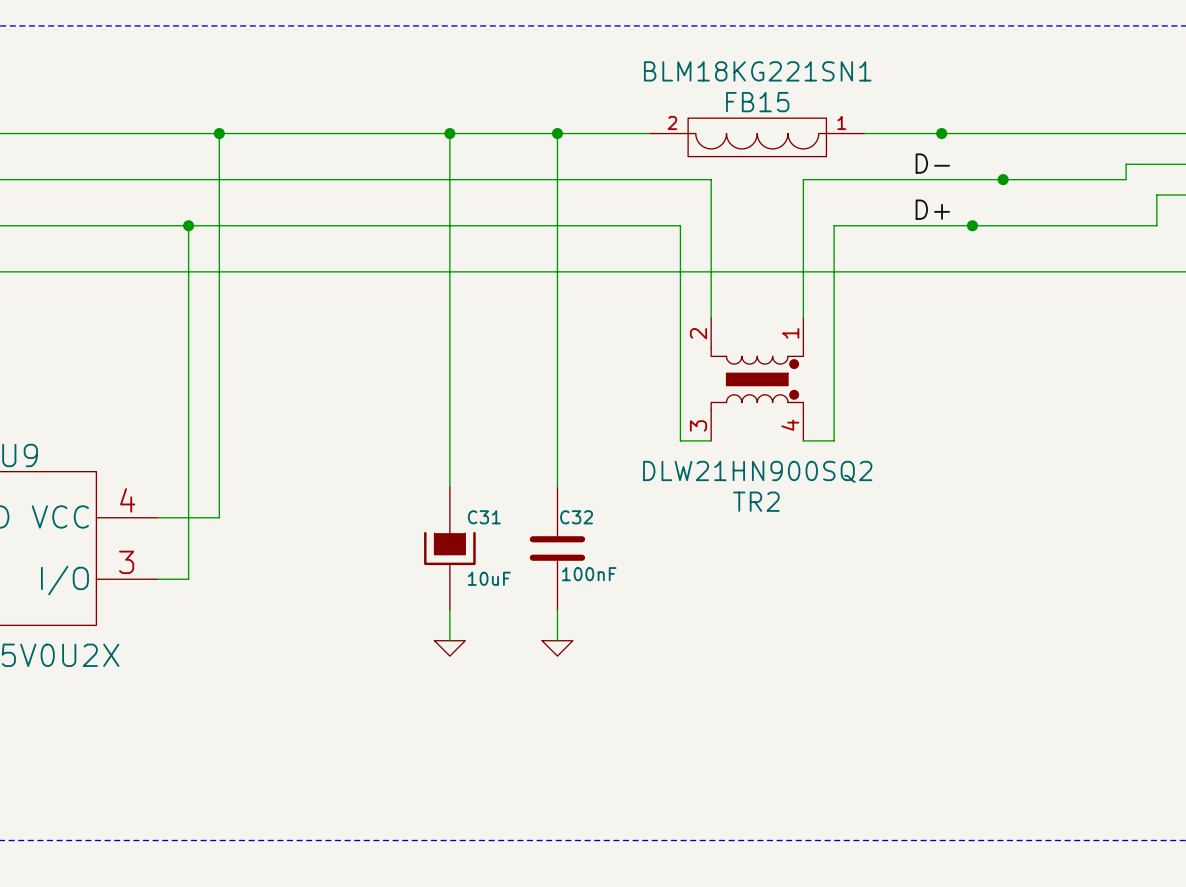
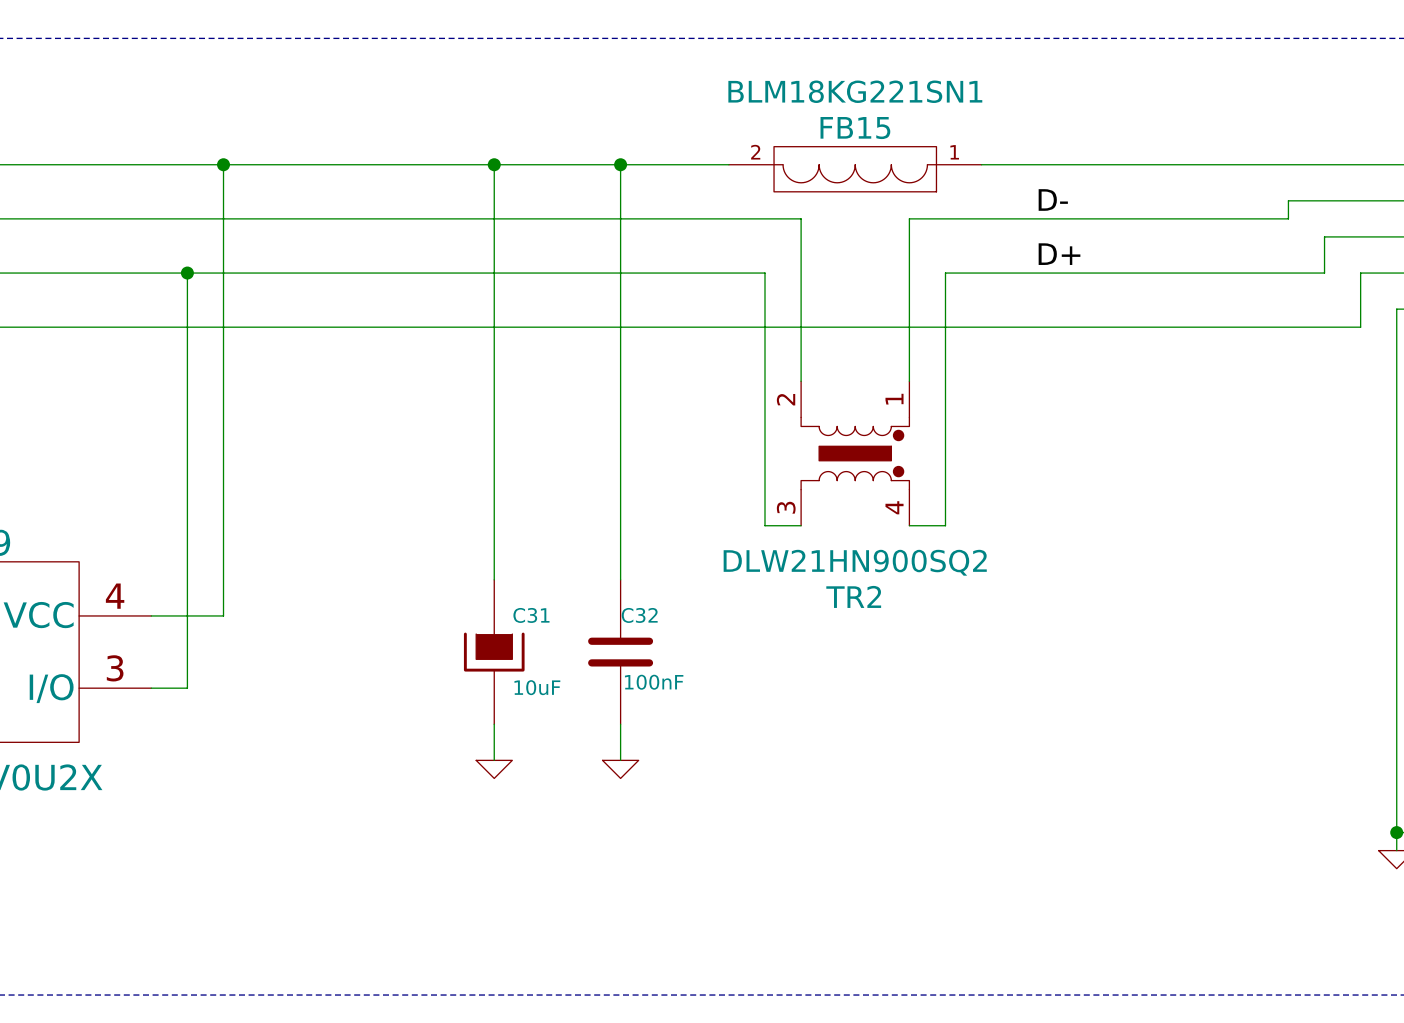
junction: (941, 133) -> none
junction: (1003, 179) -> none
junction: (972, 225) -> none

